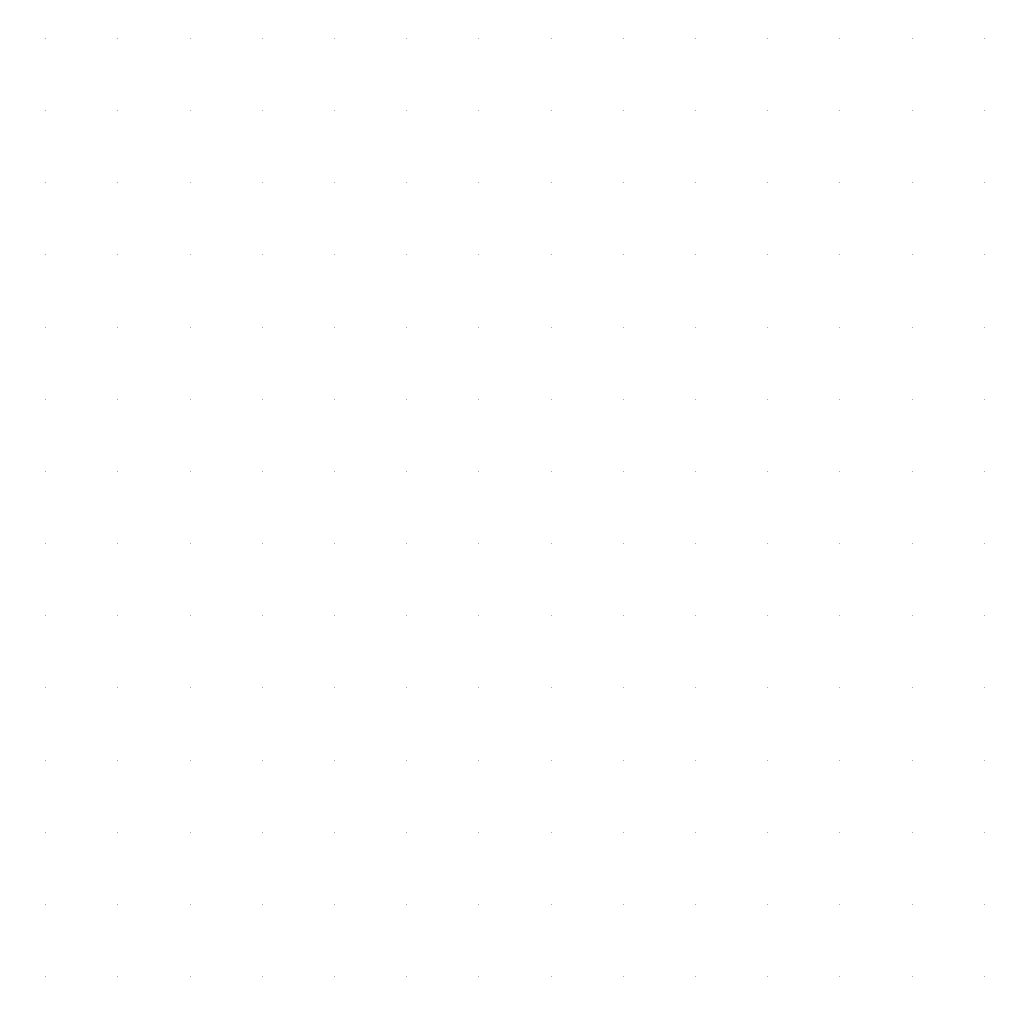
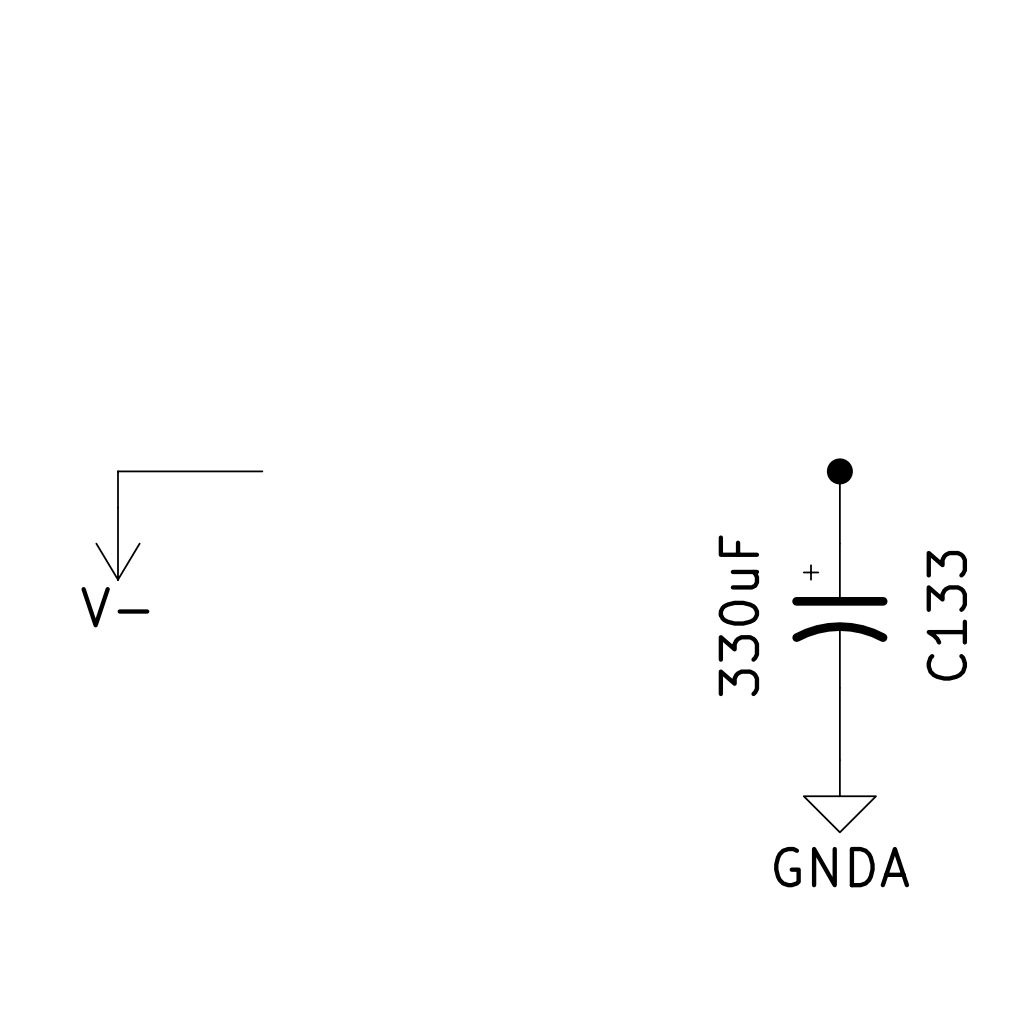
wire: none -> (262, 471) (117, 471) (117, 507)
wire: none -> (839, 471) (839, 543)
junction: none -> (839, 471)
power symbol: none -> V- (117, 543)
C133: none -> 330uF (839, 615)
wire: none -> (839, 687) (839, 760)
power symbol: none -> GNDA (839, 796)

